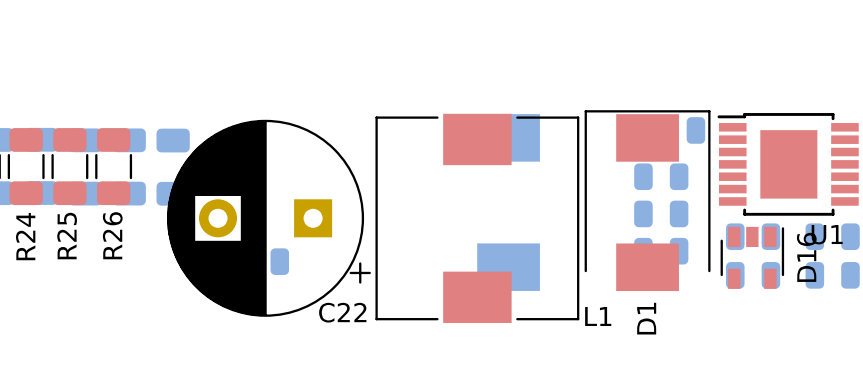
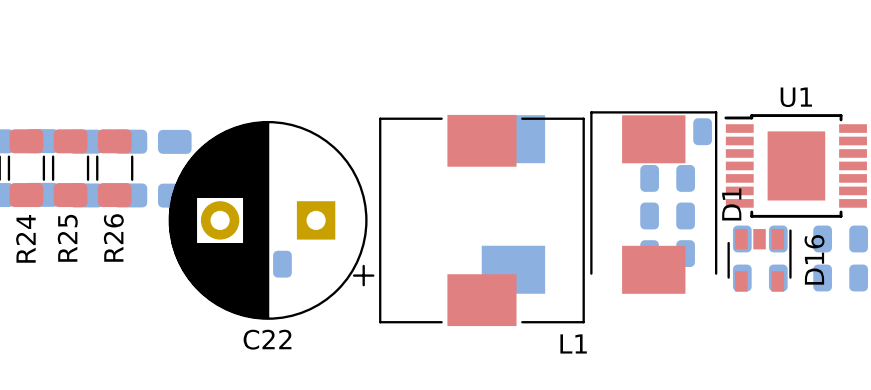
U1 name position: U1 (827, 234) -> U1 (796, 97)
C22 name position: C22 (342, 312) -> C22 (267, 339)
L1 name position: L1 (598, 316) -> L1 (573, 343)
D1 name position: D1 (646, 318) -> D1 (731, 204)

